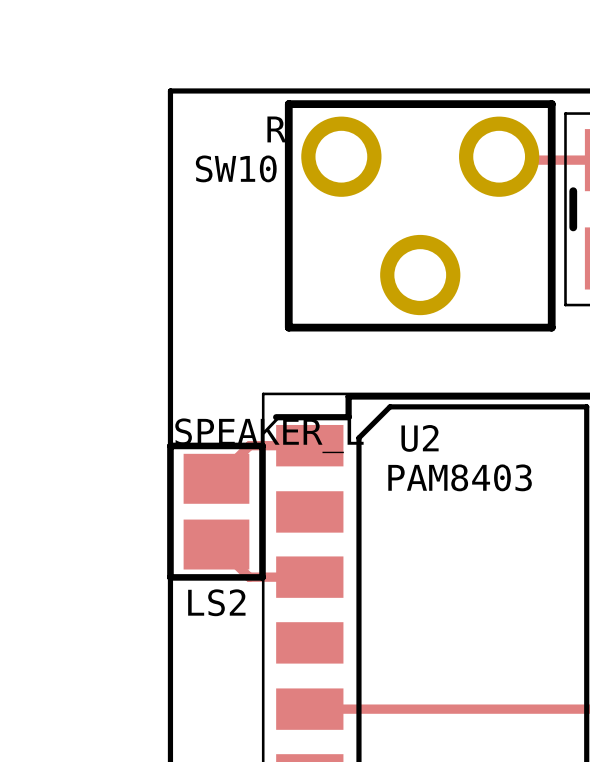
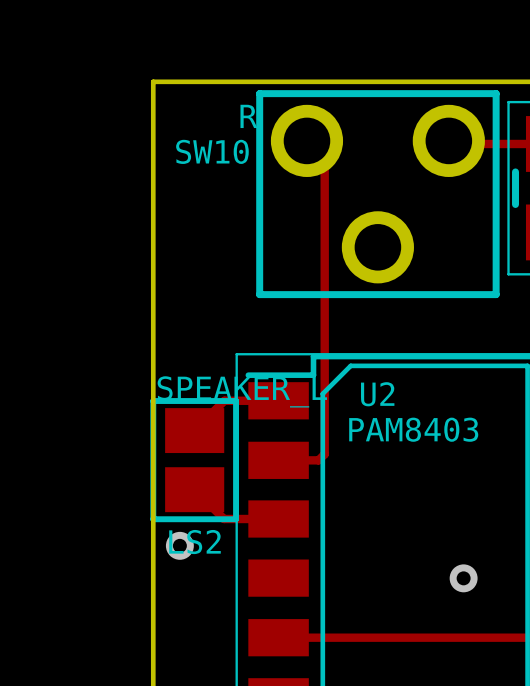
track: none -> (306, 140) (324, 158) (324, 454) (318, 460) (278, 460)
via: none -> (179, 545)
via: none -> (463, 578)

